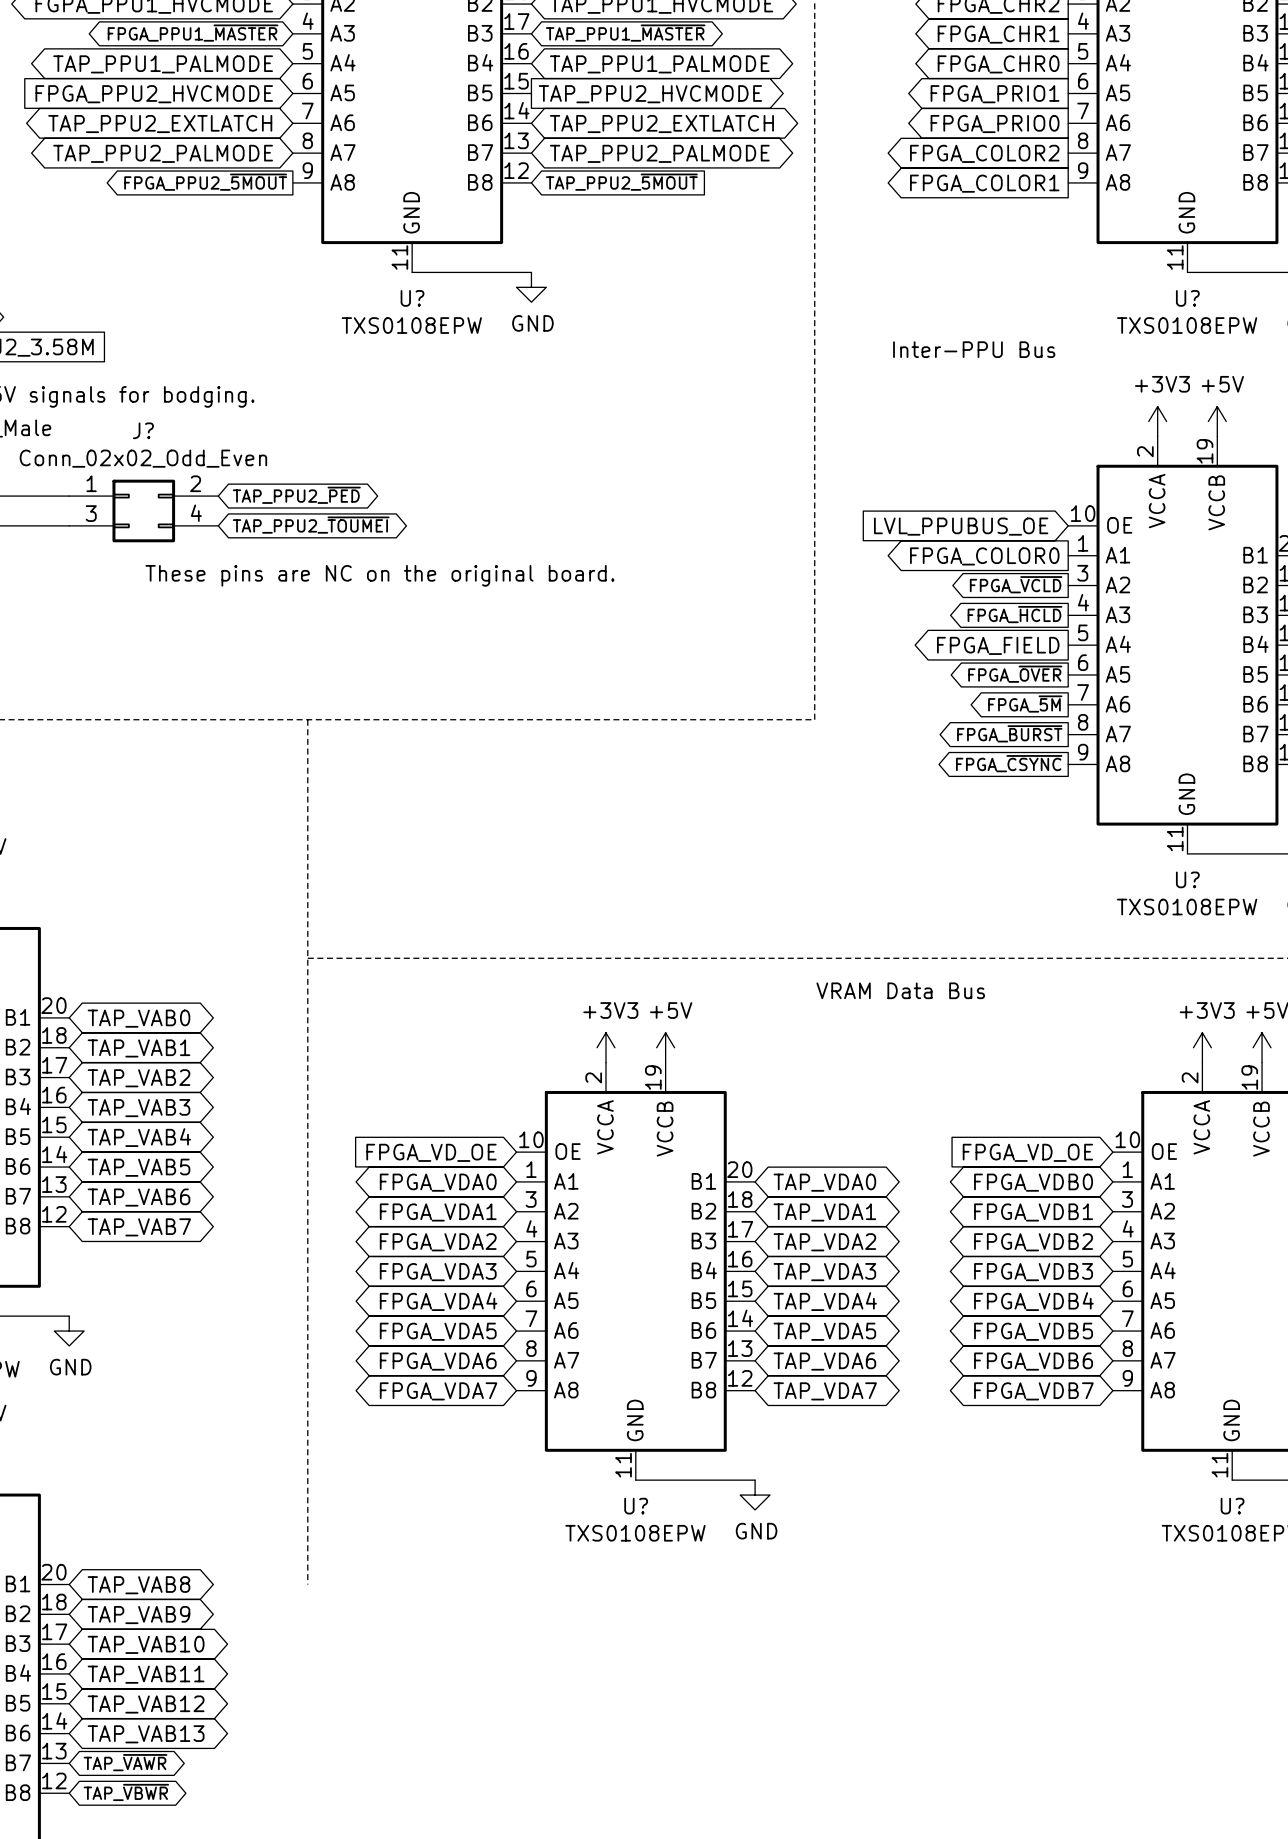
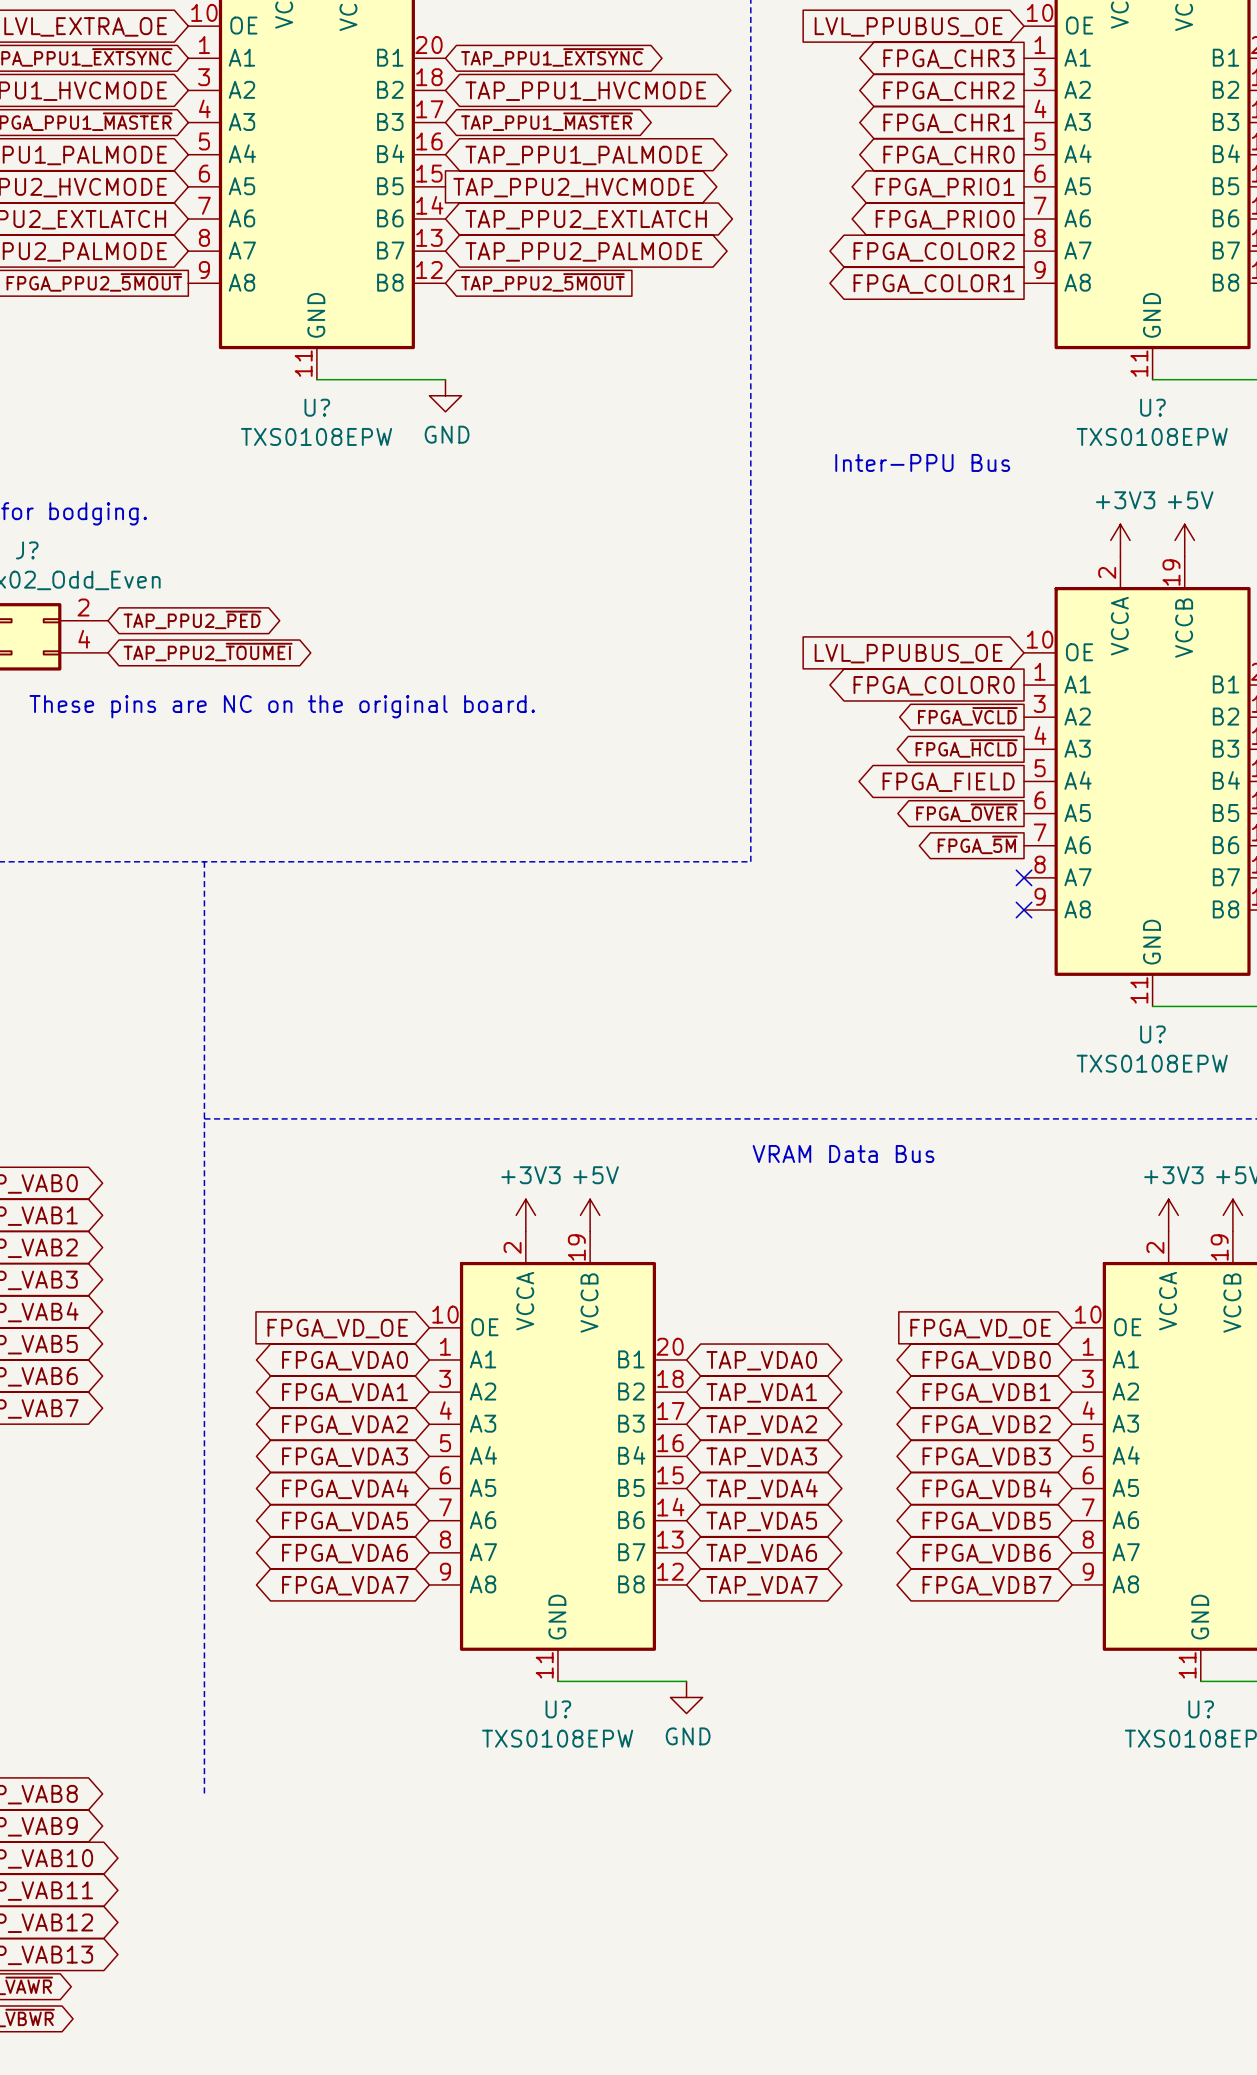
global label: FPGA_~{BURST} (1009, 733) -> none
no-connect mark: none -> (1024, 877)
global label: FPGA_~{CSYNC} (1009, 763) -> none
no-connect mark: none -> (1024, 910)

